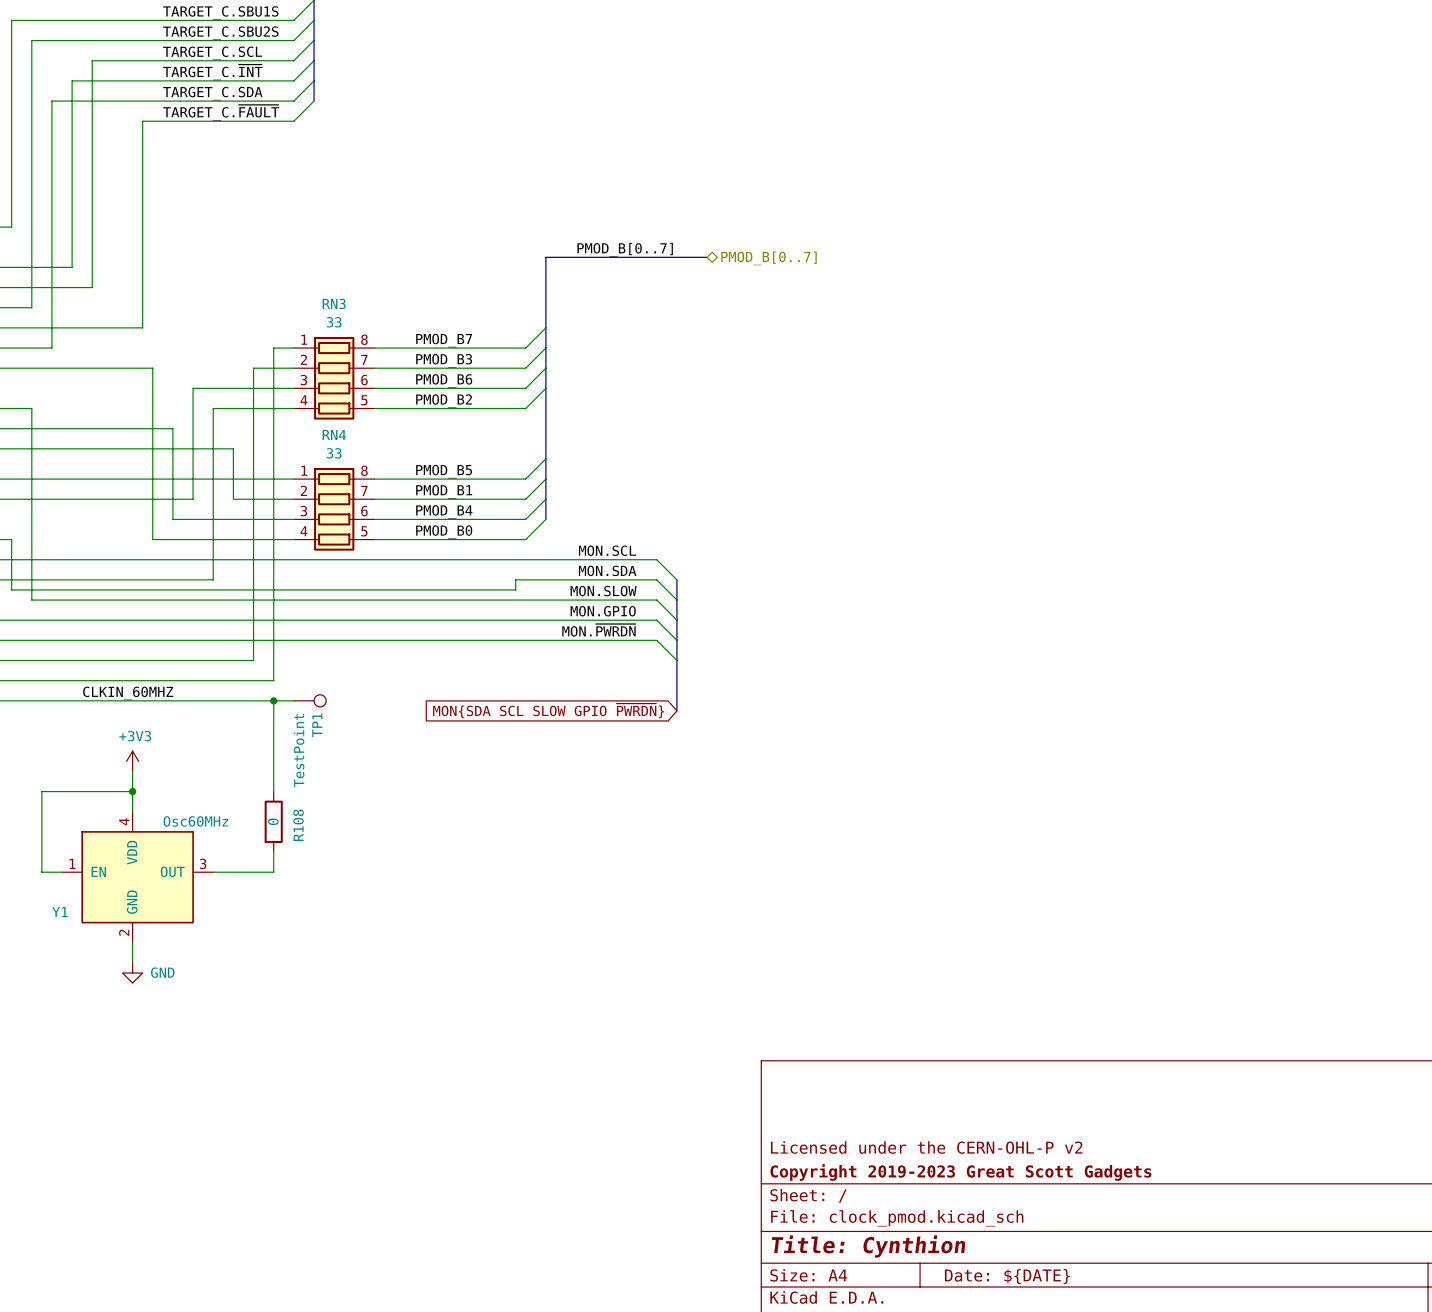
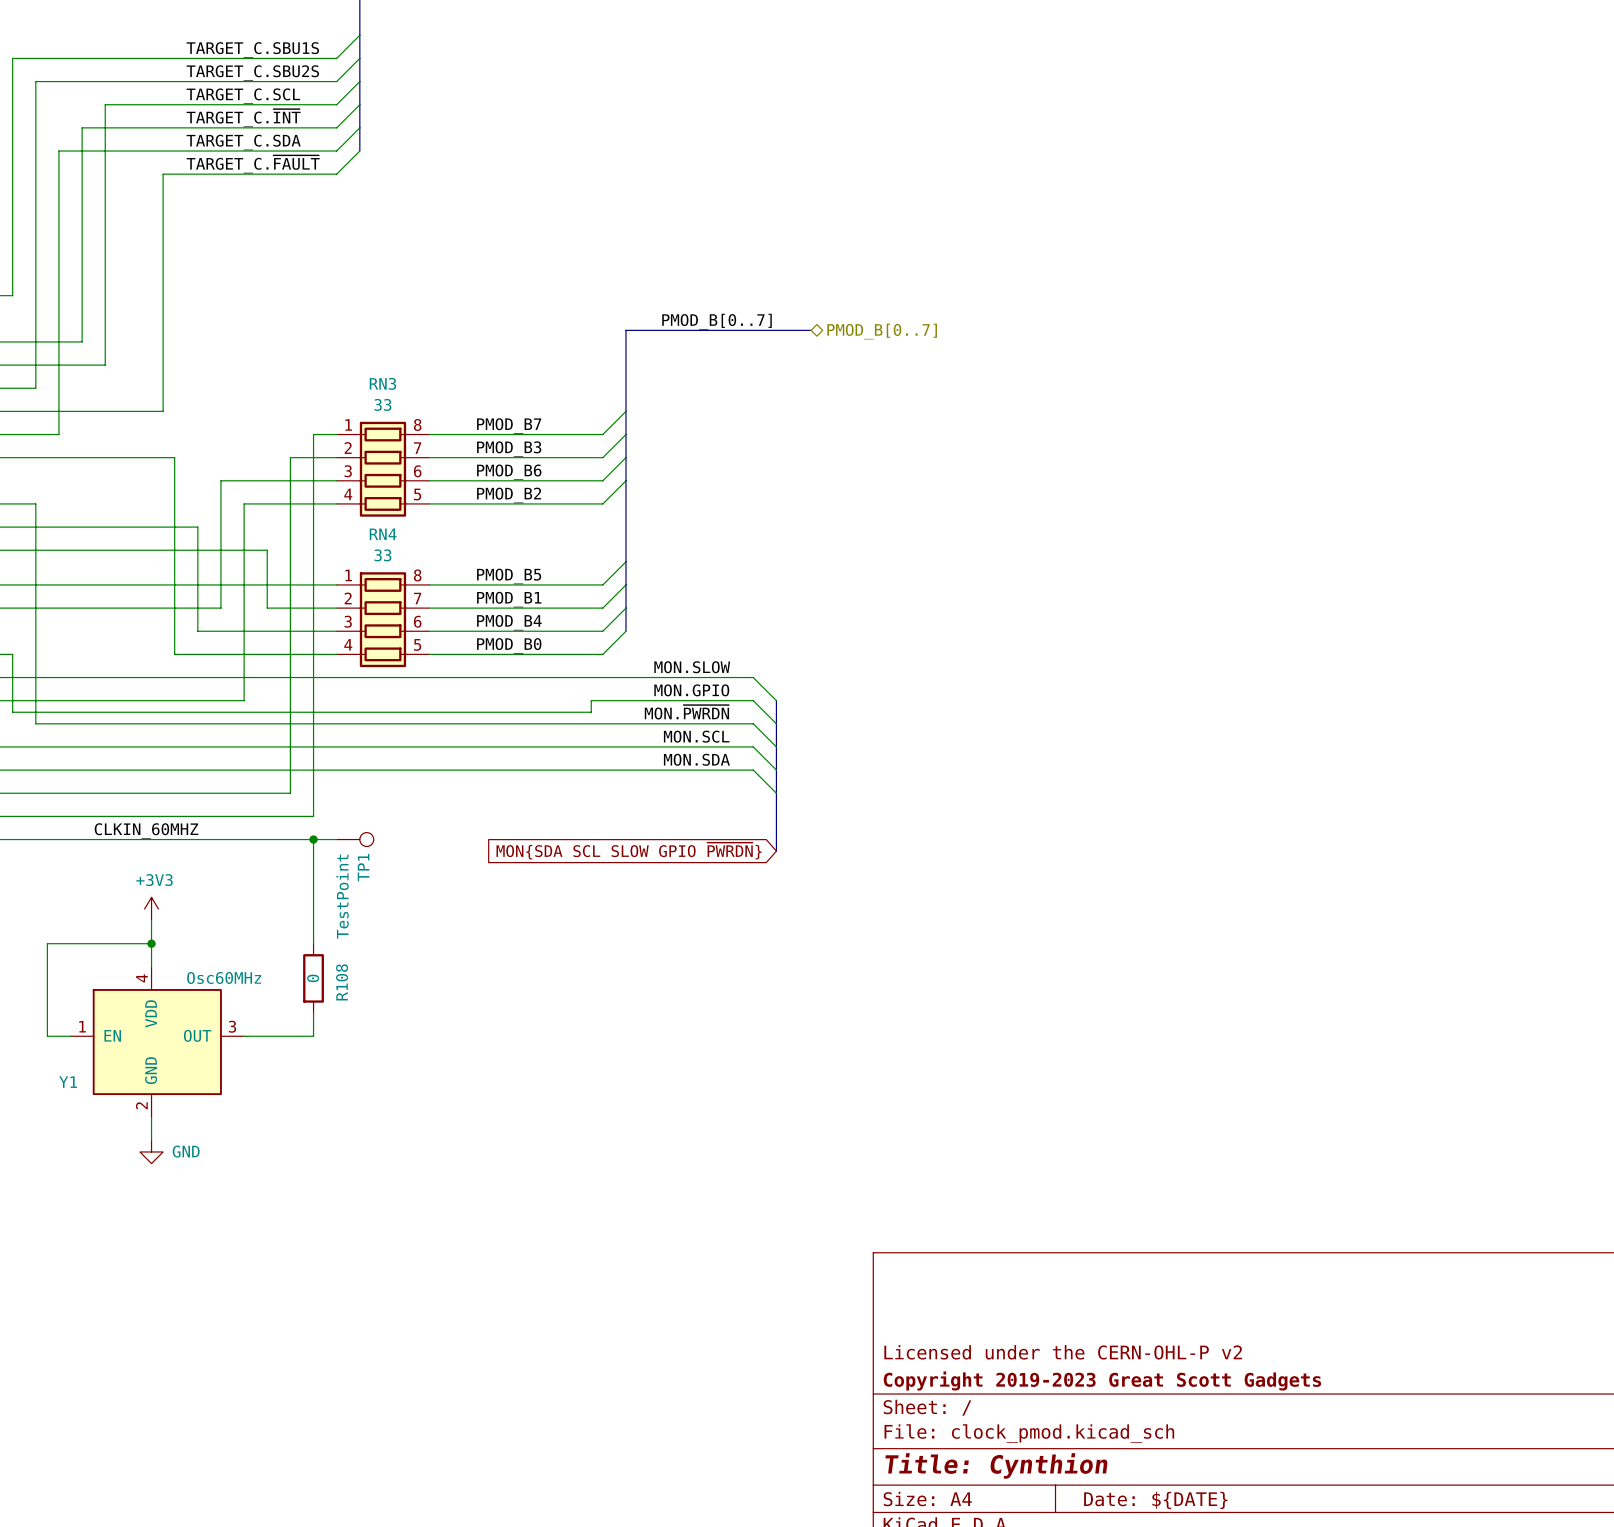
label: MON.SCL (607, 550) -> MON.SLOW (692, 667)
label: MON.SDA (607, 570) -> MON.GPIO (691, 690)
label: MON.SLOW (603, 591) -> MON.~{PWRDN} (686, 712)
label: MON.GPIO (603, 611) -> MON.SCL (696, 736)
label: MON.~{PWRDN} (598, 630) -> MON.SDA (696, 759)

